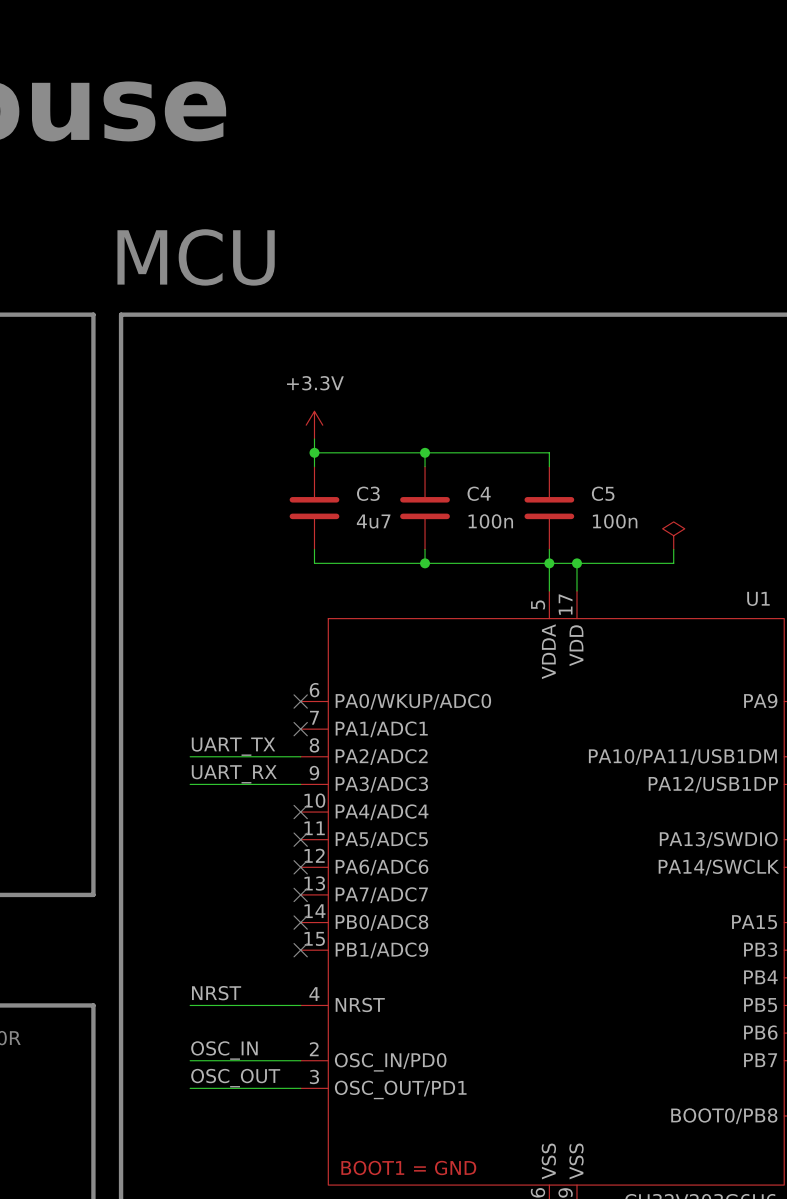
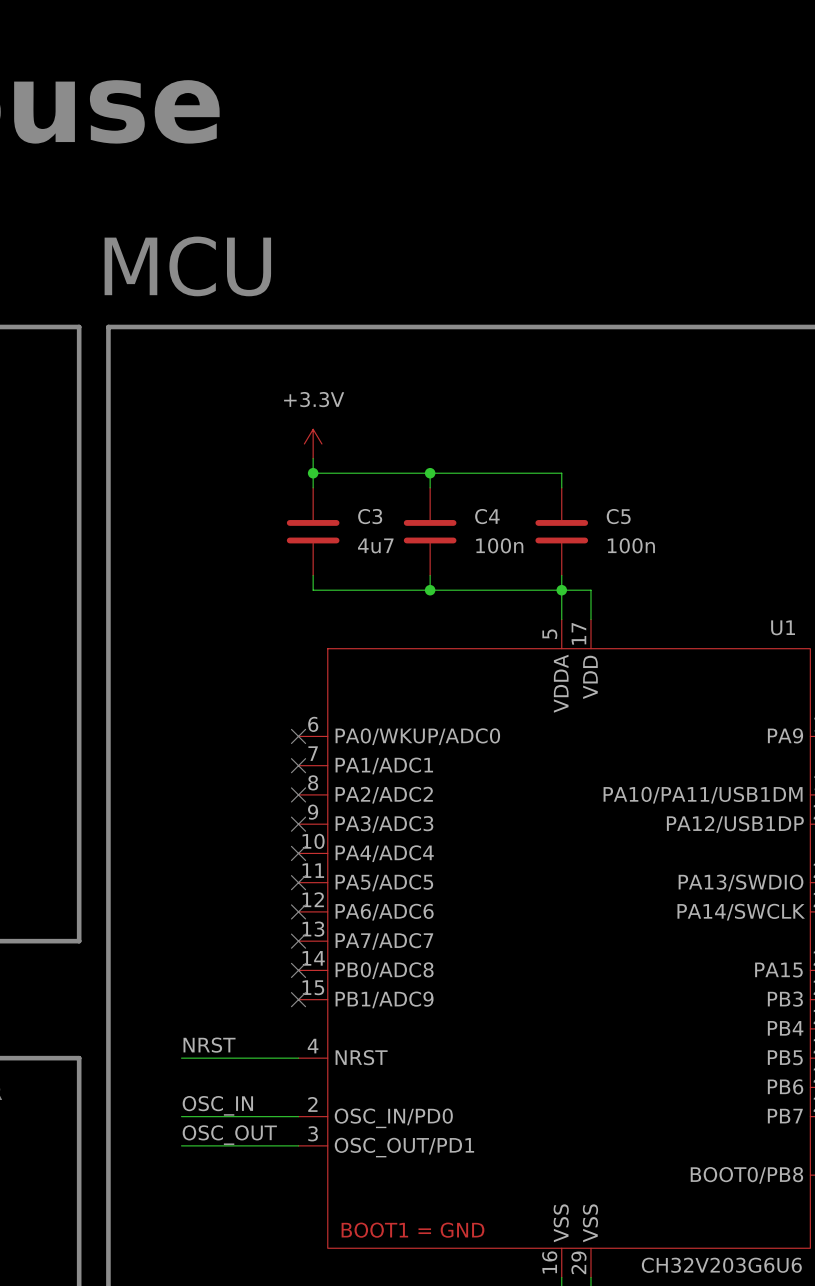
power symbol: (673, 535) -> none
wire: (673, 549) (673, 563) (576, 563) -> none
junction: (576, 563) -> none
label: UART_TX (233, 746) -> none
wire: (190, 756) (300, 756) -> none
no-connect mark: none -> (298, 794)
label: UART_RX (234, 774) -> none
wire: (190, 784) (300, 784) -> none
no-connect mark: none -> (298, 824)

